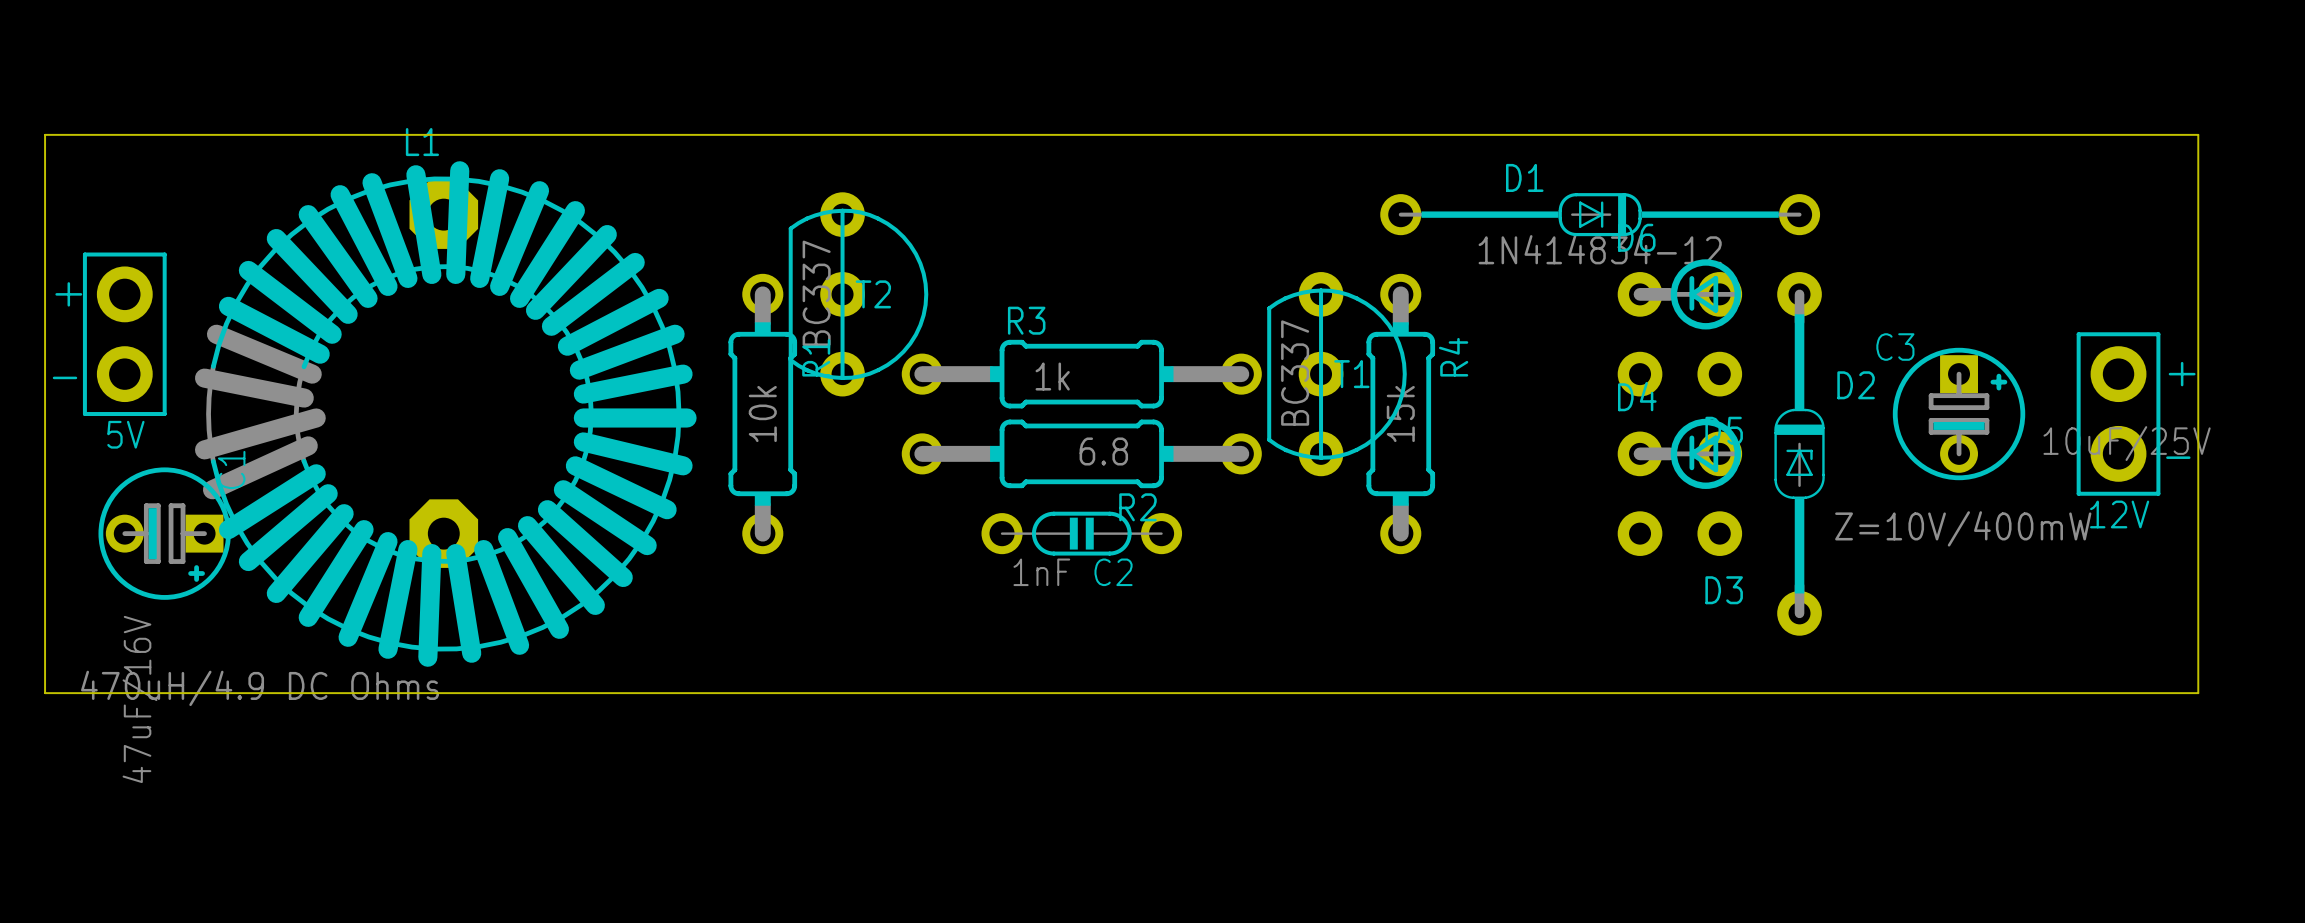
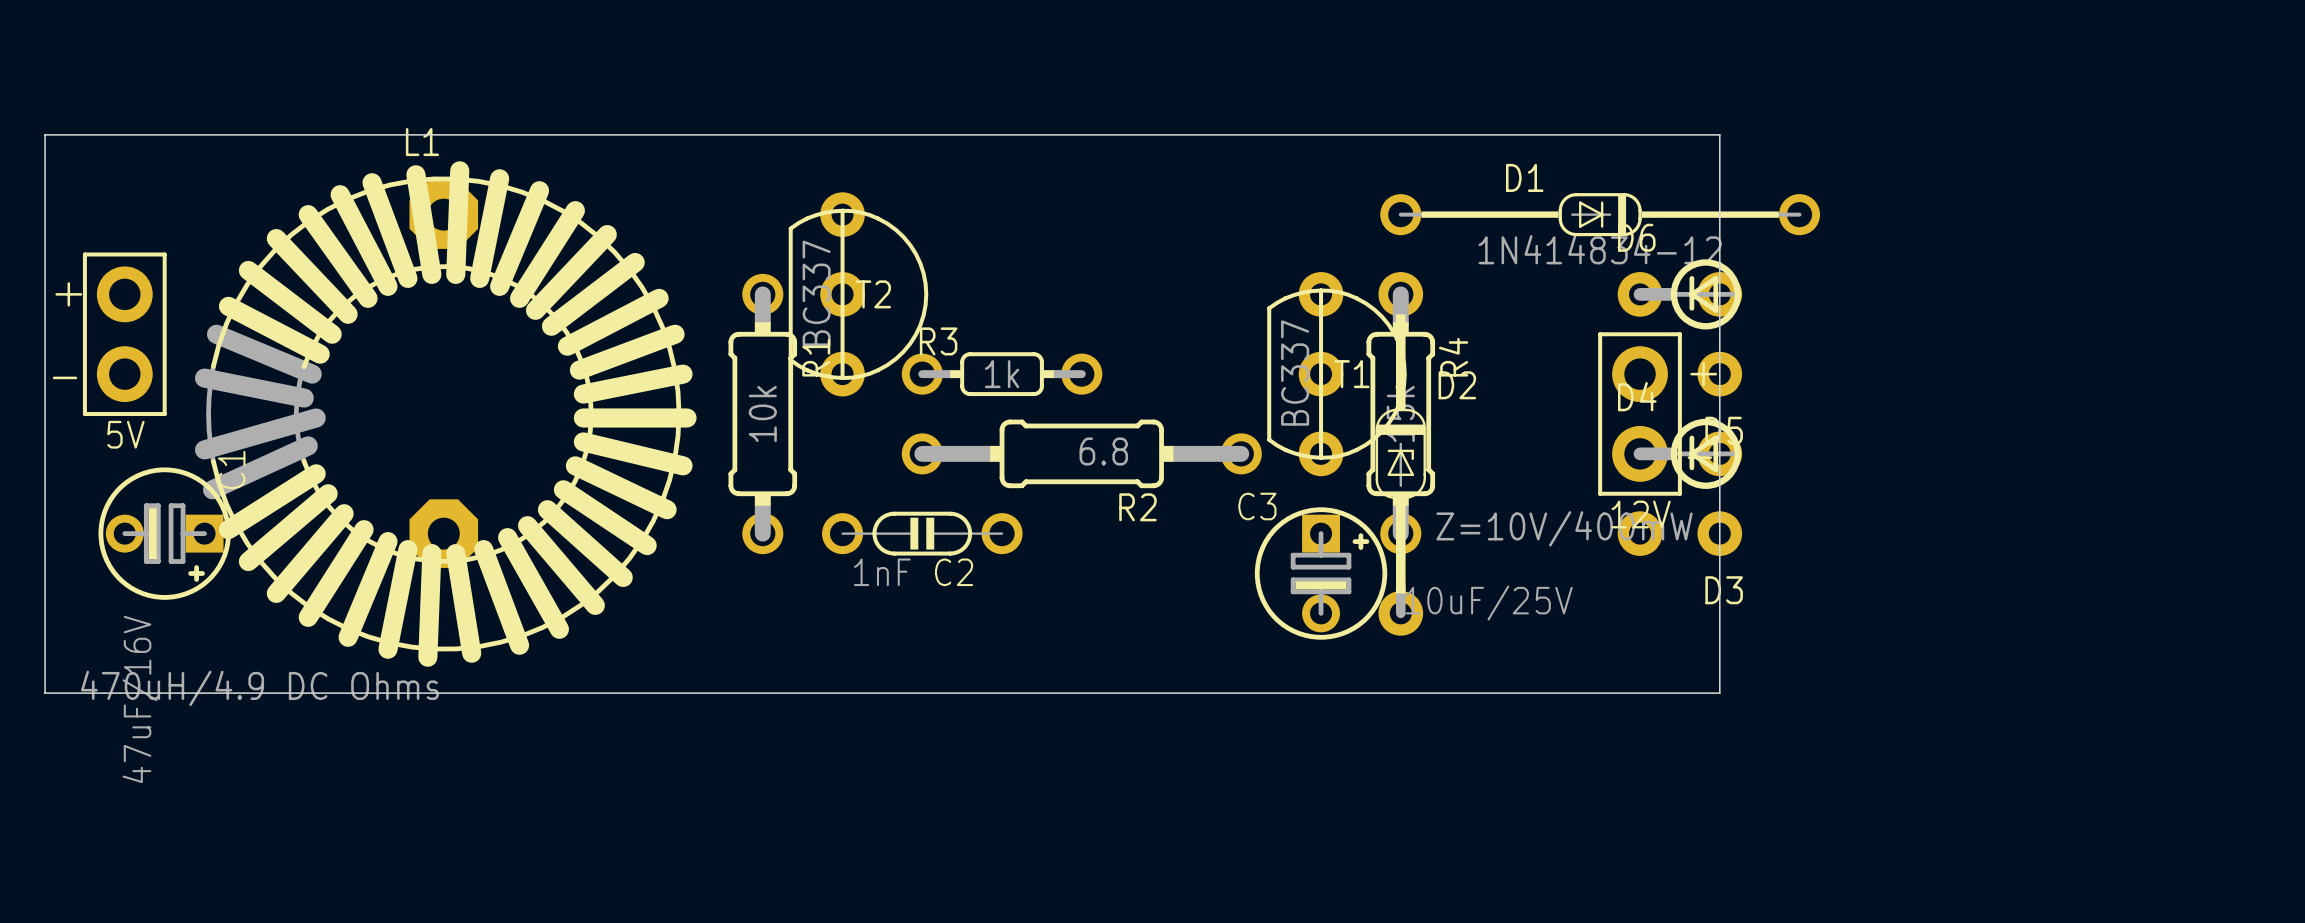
board edge: (1719, 134) (2198, 134) (2198, 693) (1719, 693) -> (1719, 134) (1719, 693)
R3 footprint: [901, 339, 1262, 409] -> [901, 352, 1103, 397]
C3 position: (1959, 414) -> (1321, 573)
12V position: (2118, 414) -> (1640, 414)
D2 position: (1799, 453) -> (1400, 453)
C2 position: (1081, 533) -> (922, 533)

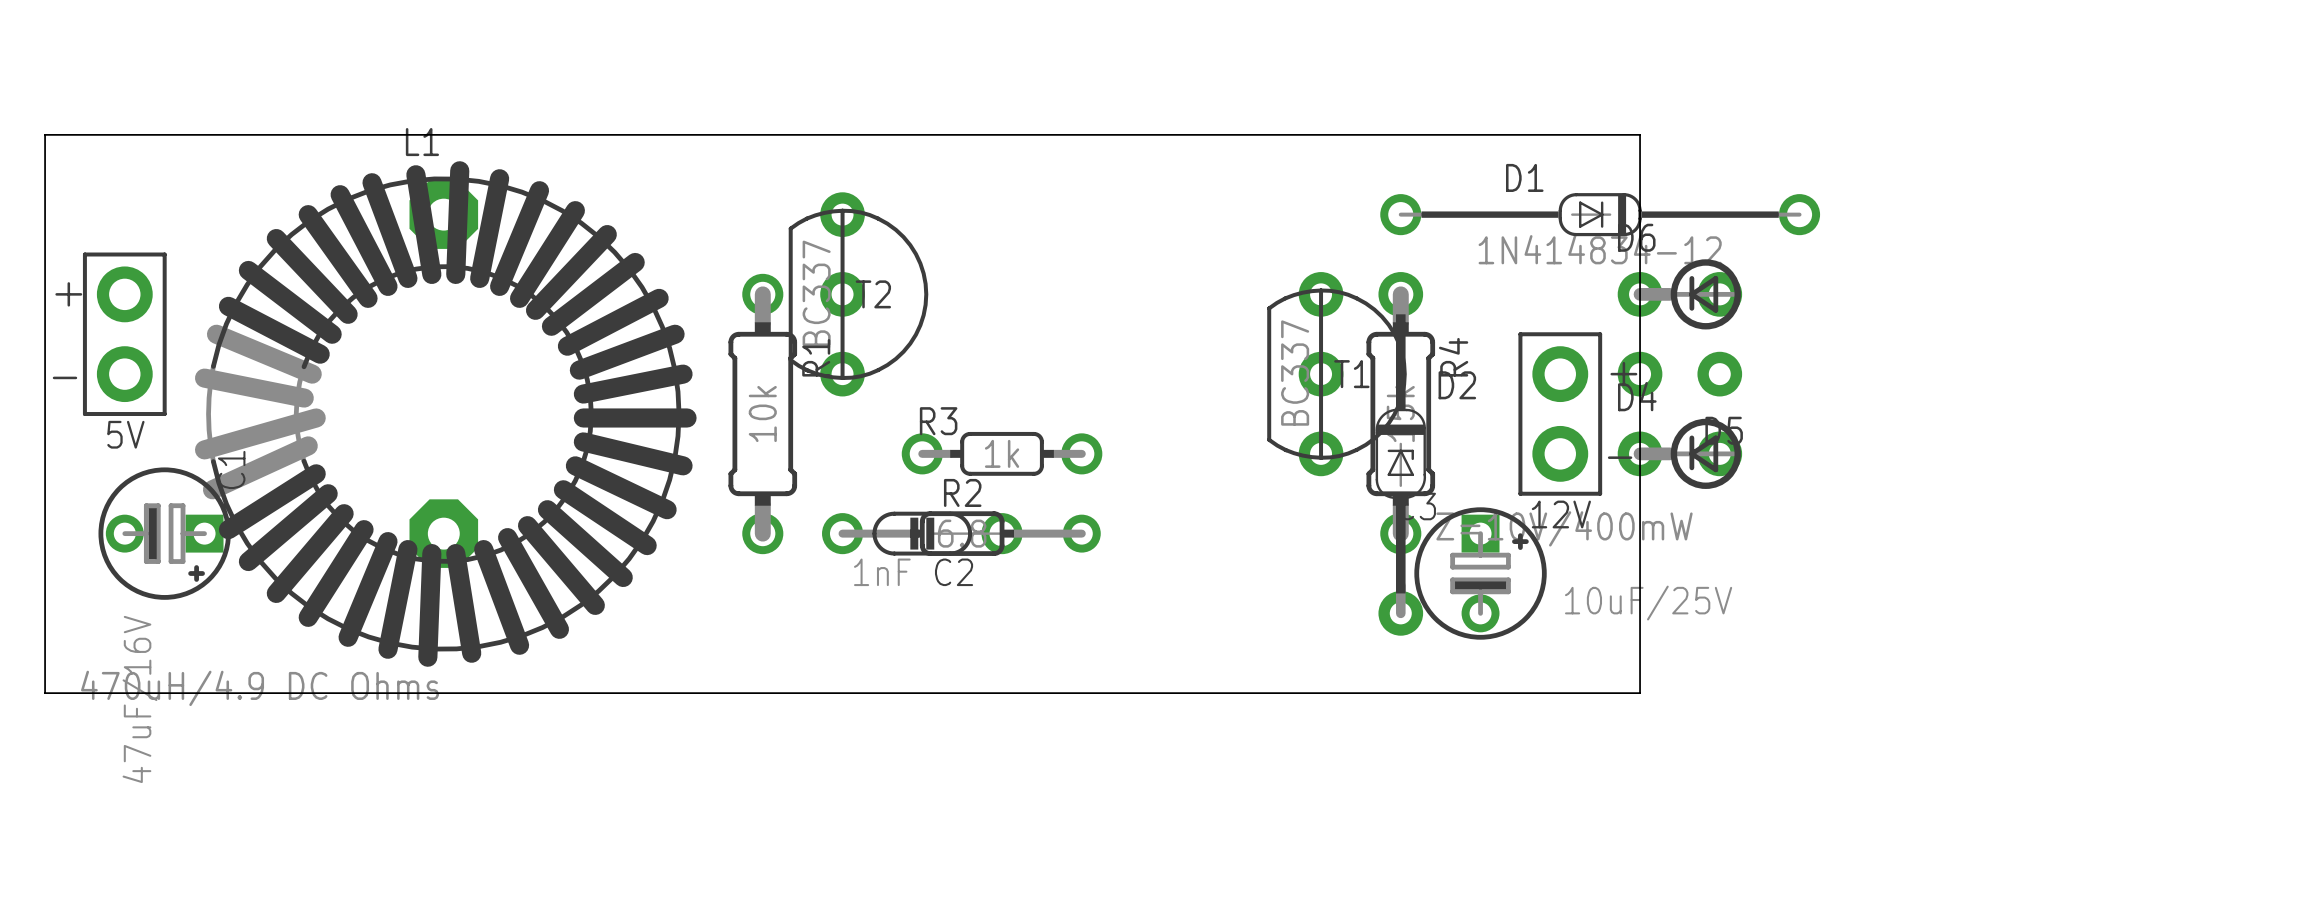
board edge: (1640, 134) (1719, 134) (1719, 693) (1640, 693) -> (1640, 134) (1640, 693)
R3 position: (1002, 374) -> (1002, 453)
12V position: (1640, 414) -> (1560, 414)
R2 footprint: [901, 419, 1262, 489] -> [823, 511, 1101, 556]
R2 name position: R2 (1137, 507) -> R2 (962, 492)
D3: (1679, 533) -> none
C3 position: (1321, 573) -> (1480, 573)

